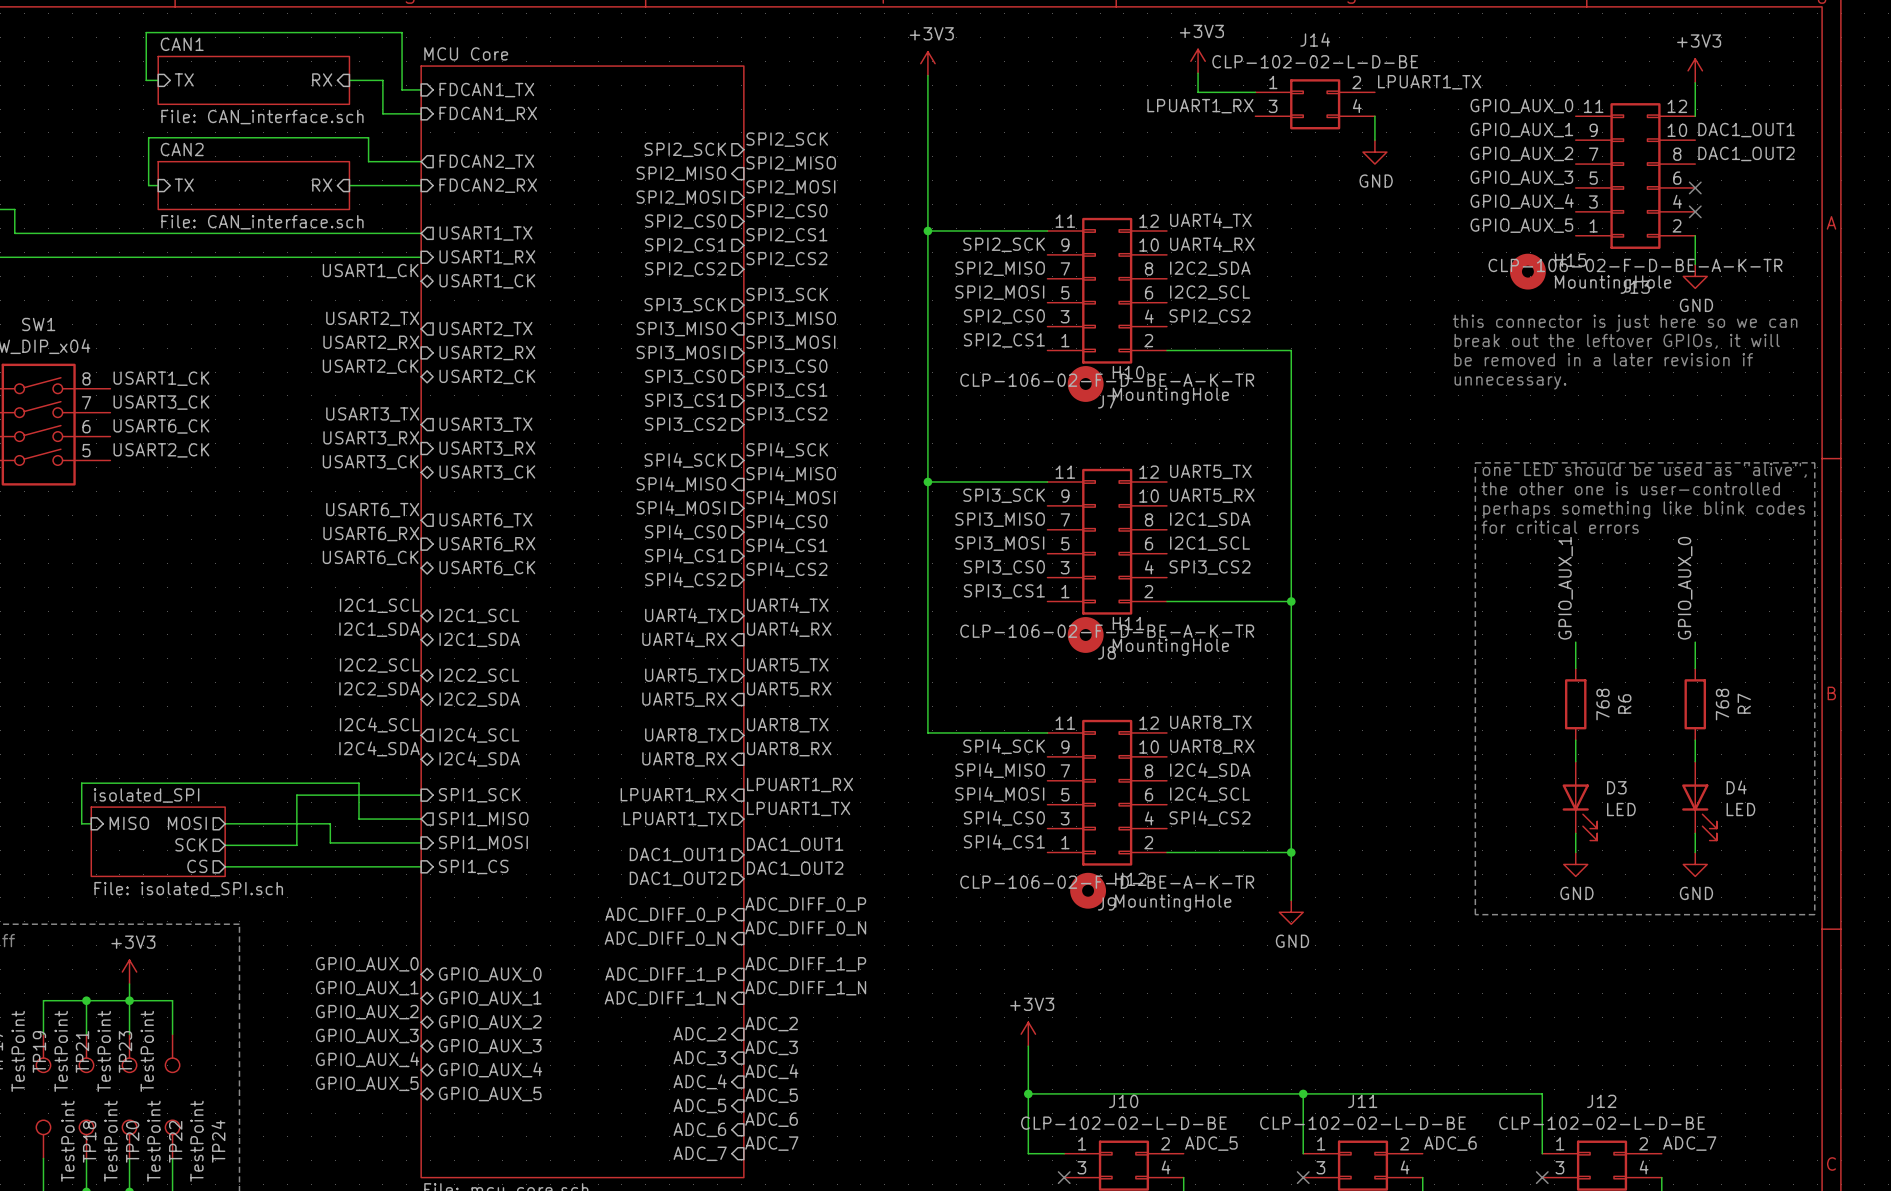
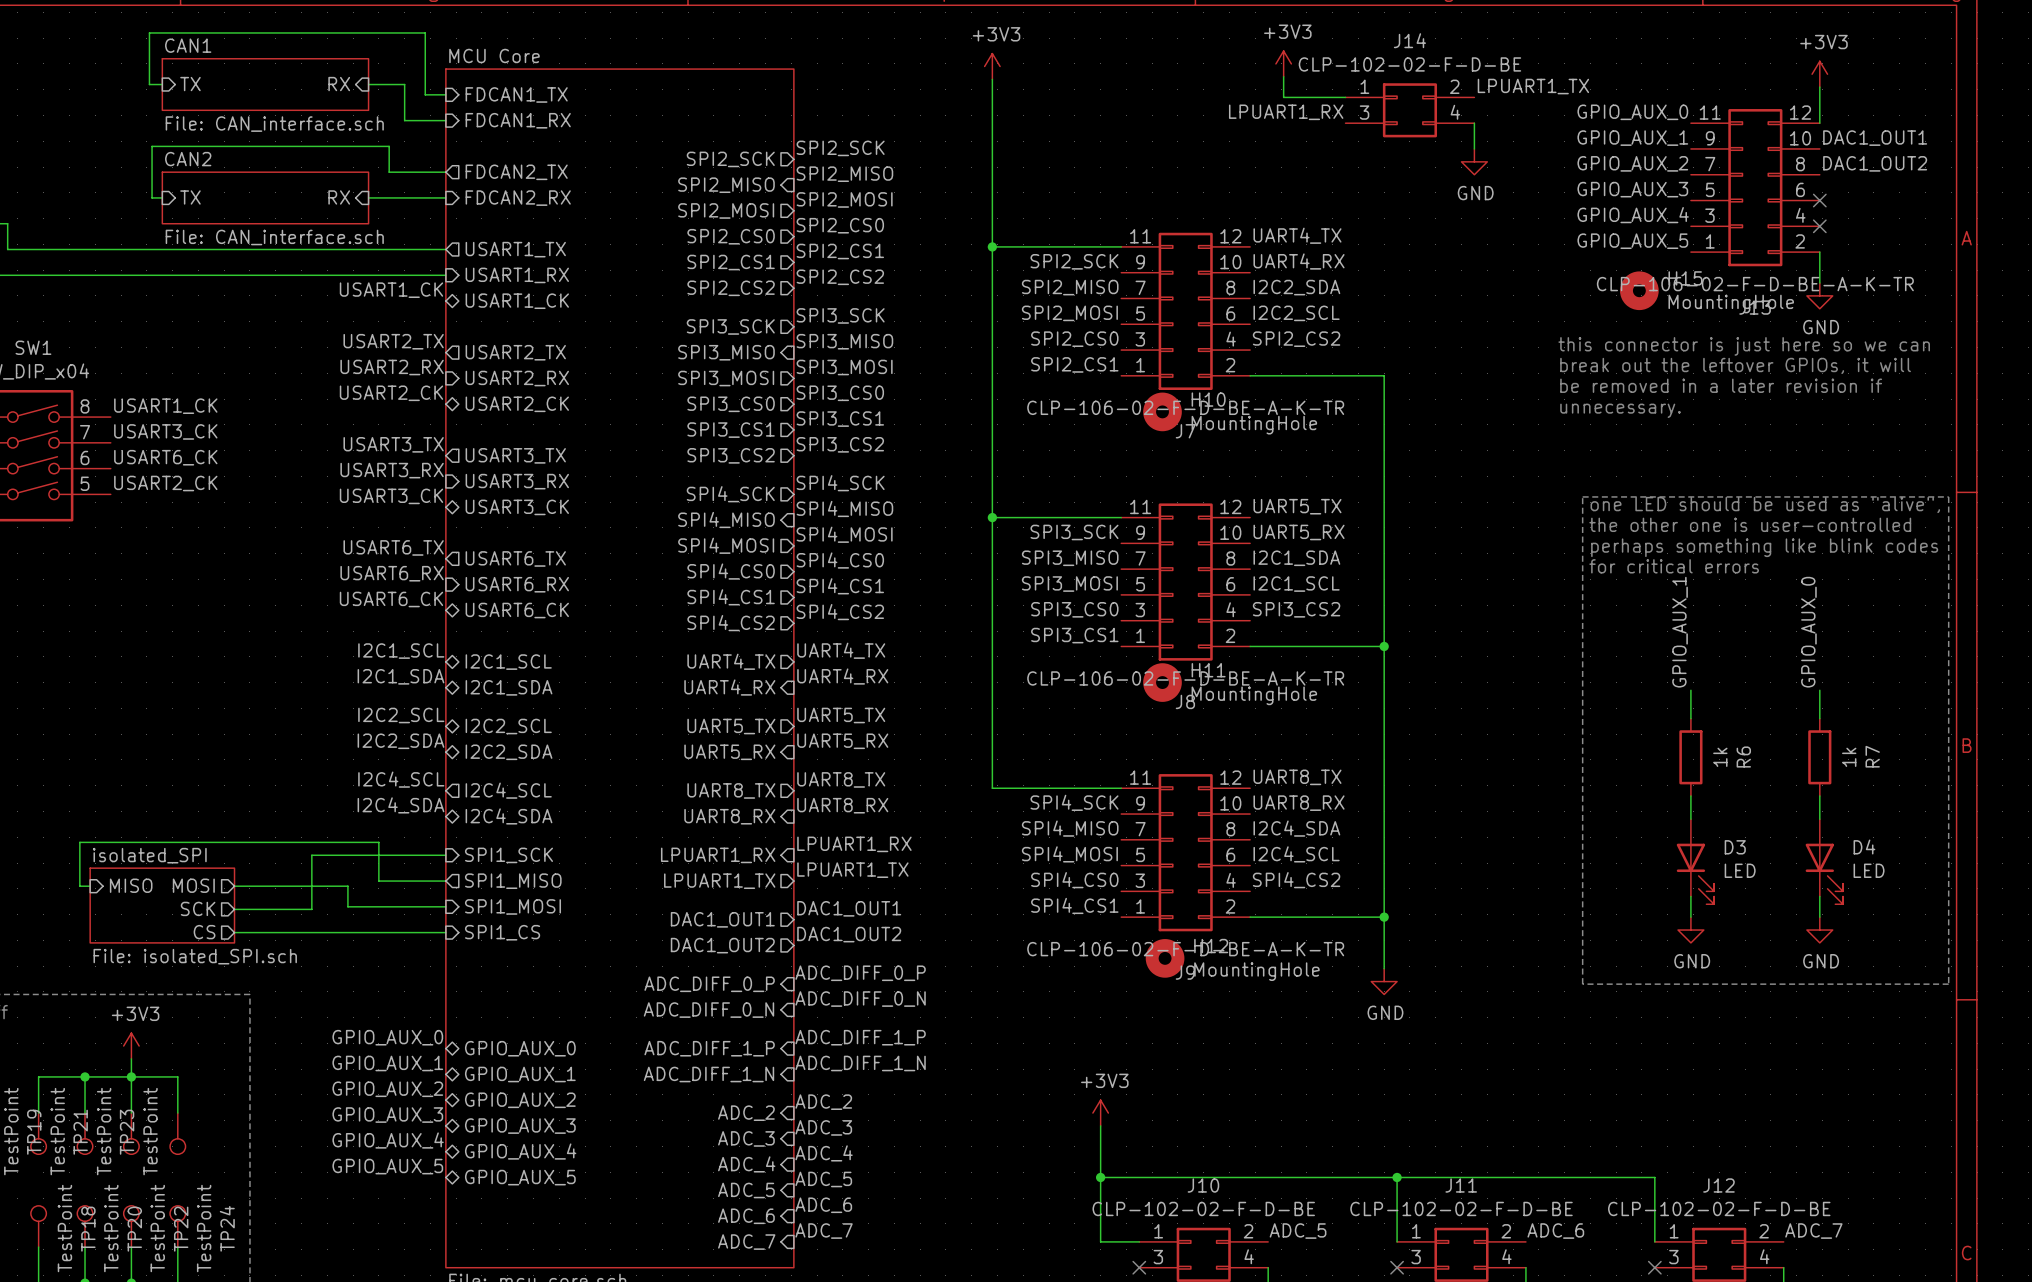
J14 value: CLP-102-02-L-D-BE (1315, 61) -> CLP-102-02-F-D-BE (1409, 64)
R6 value: 768 (1603, 704) -> 1k (1720, 757)
R7 value: 768 (1722, 704) -> 1k (1849, 757)
J10 value: CLP-102-02-L-D-BE (1123, 1123) -> CLP-102-02-F-D-BE (1203, 1208)
J11 value: CLP-102-02-L-D-BE (1362, 1123) -> CLP-102-02-F-D-BE (1461, 1208)
J12 value: CLP-102-02-L-D-BE (1602, 1123) -> CLP-102-02-F-D-BE (1719, 1208)

